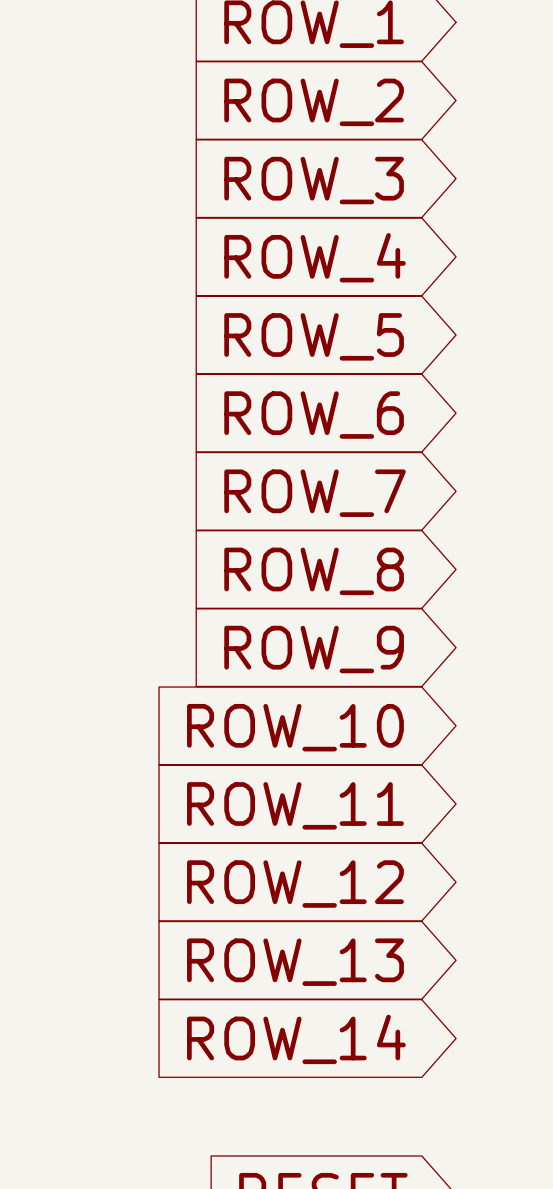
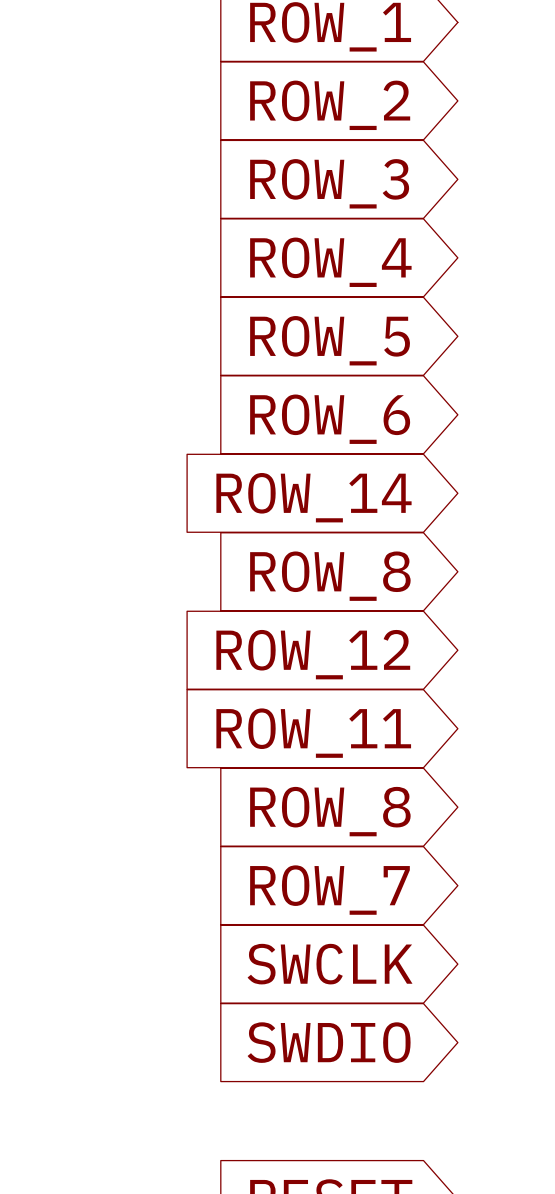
global label: ROW_7 (315, 493) -> ROW_14 (313, 497)
global label: ROW_9 (314, 649) -> ROW_12 (313, 654)
global label: ROW_10 (295, 727) -> ROW_11 (313, 733)
global label: ROW_11 (295, 805) -> ROW_8 (330, 811)
global label: ROW_12 (295, 884) -> ROW_7 (329, 890)
global label: ROW_13 (295, 962) -> SWCLK (330, 964)
global label: ROW_14 (296, 1039) -> SWDIO (329, 1042)

